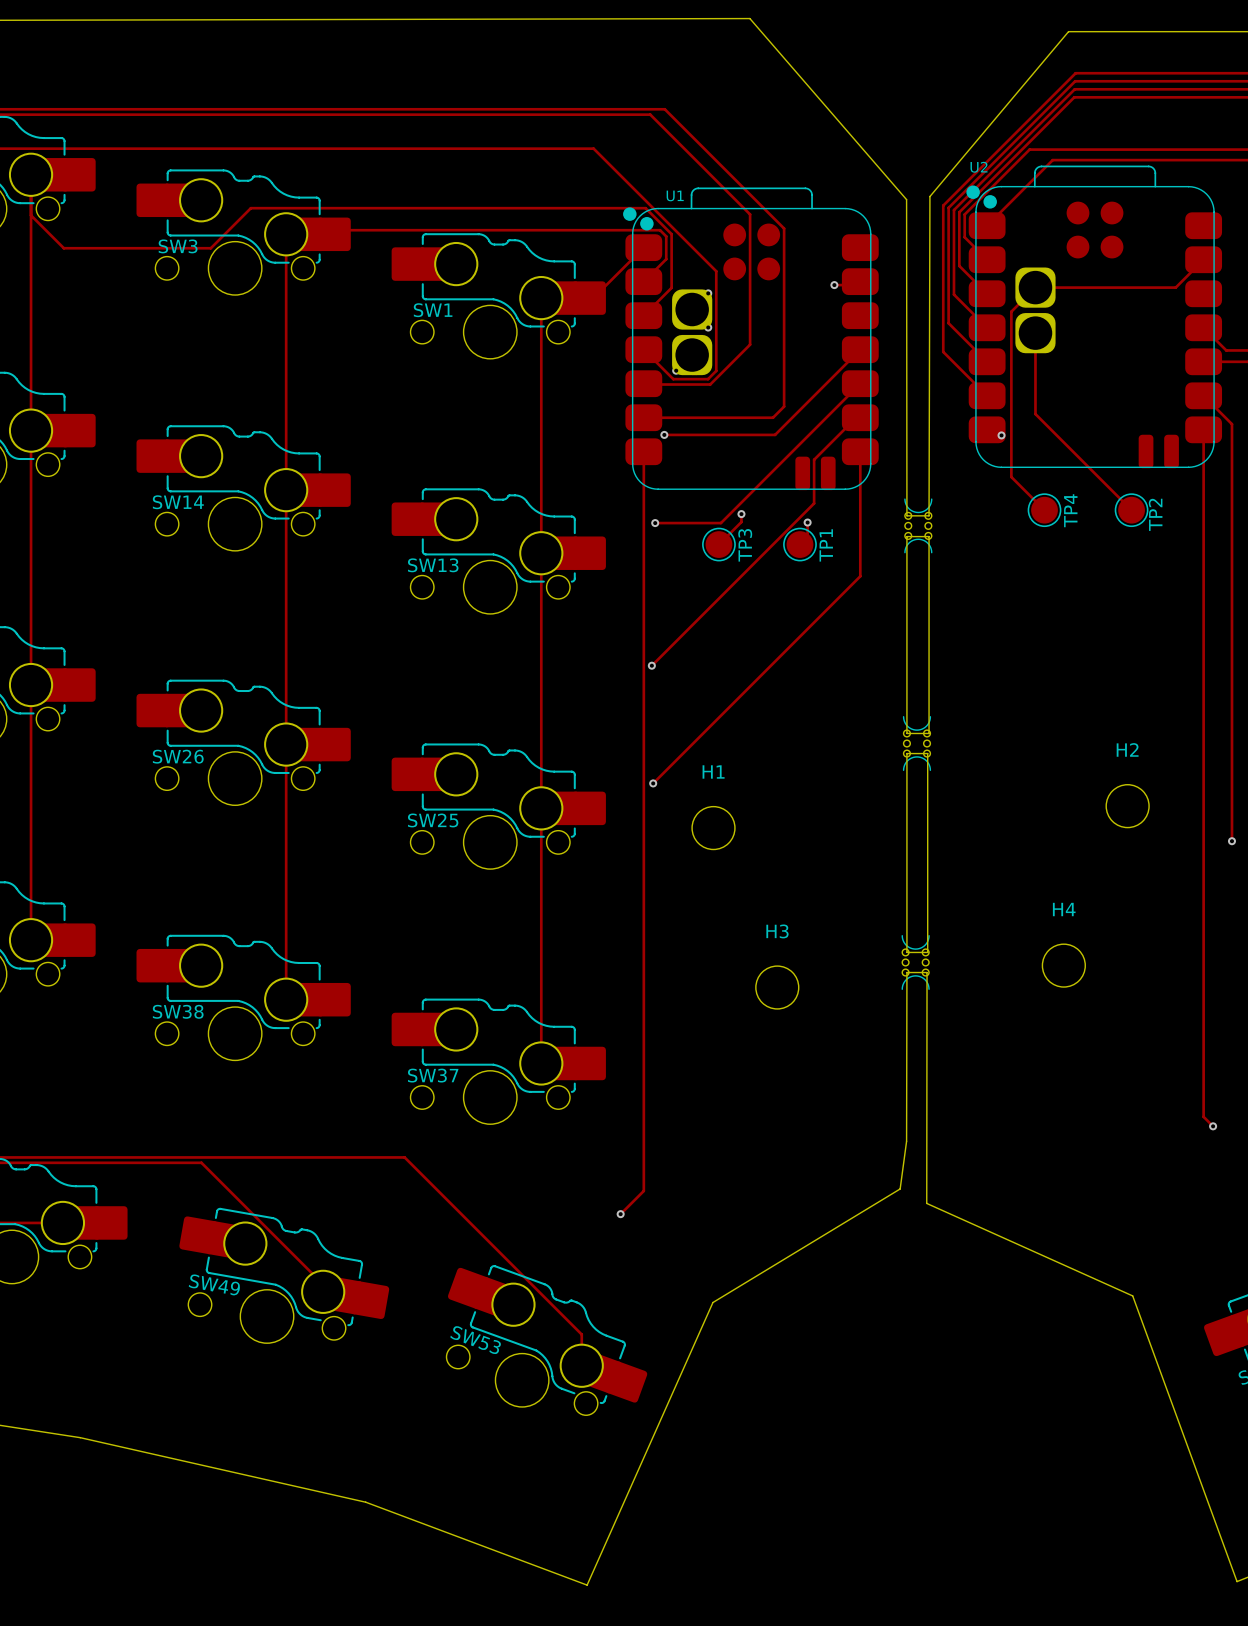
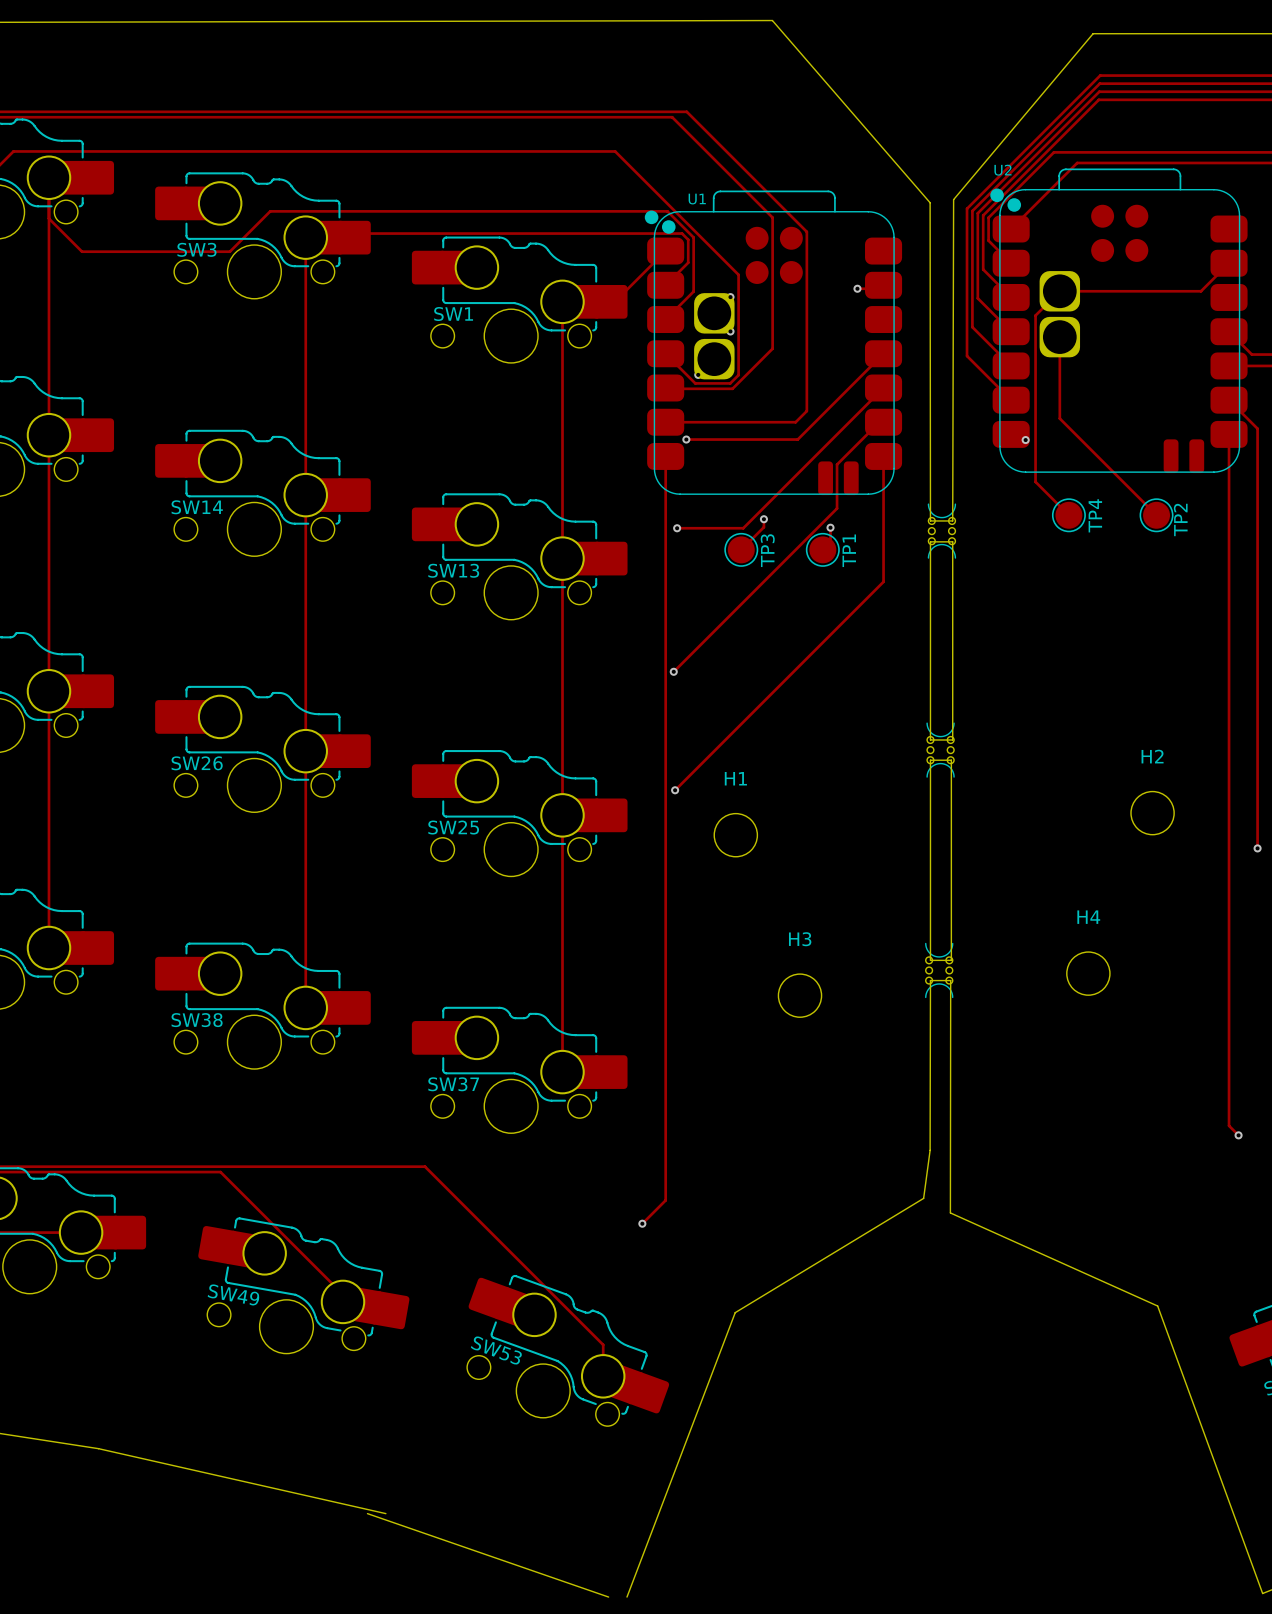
board edge: (712, 1302) (587, 1585) (365, 1502) -> (735, 1312) (626, 1597)
board edge: none -> (367, 1513) (608, 1597)

